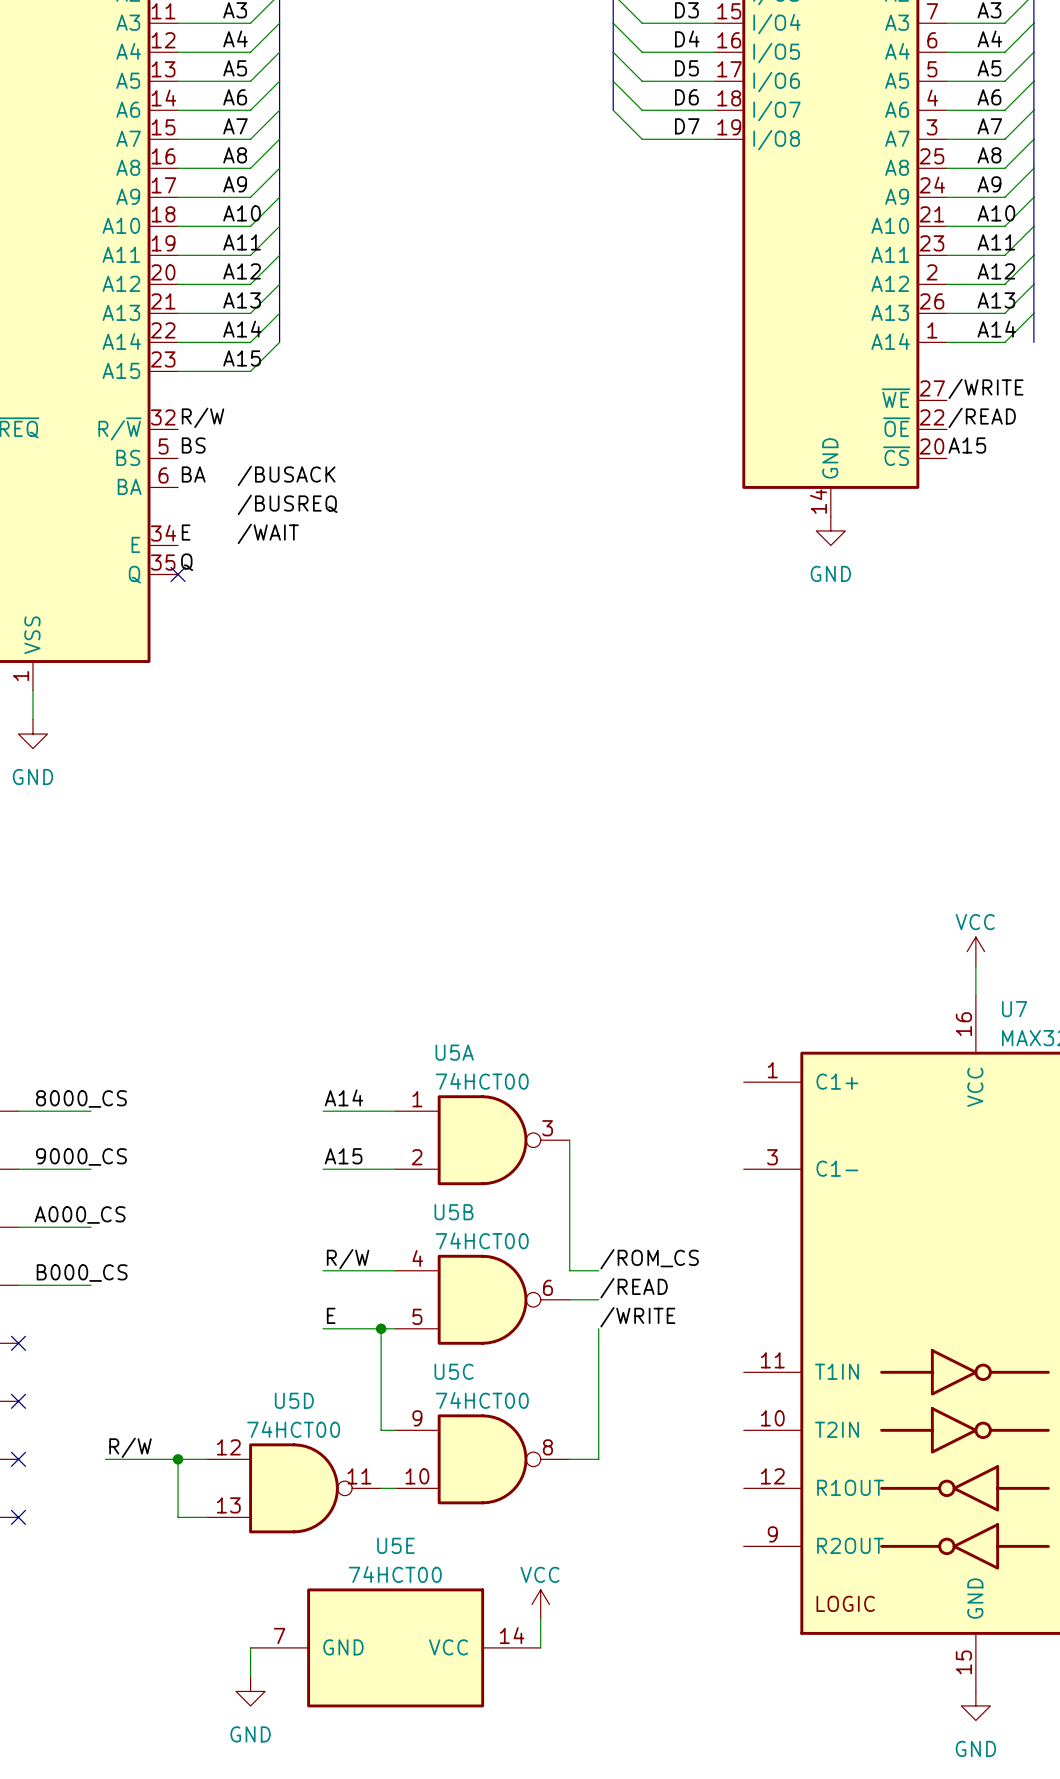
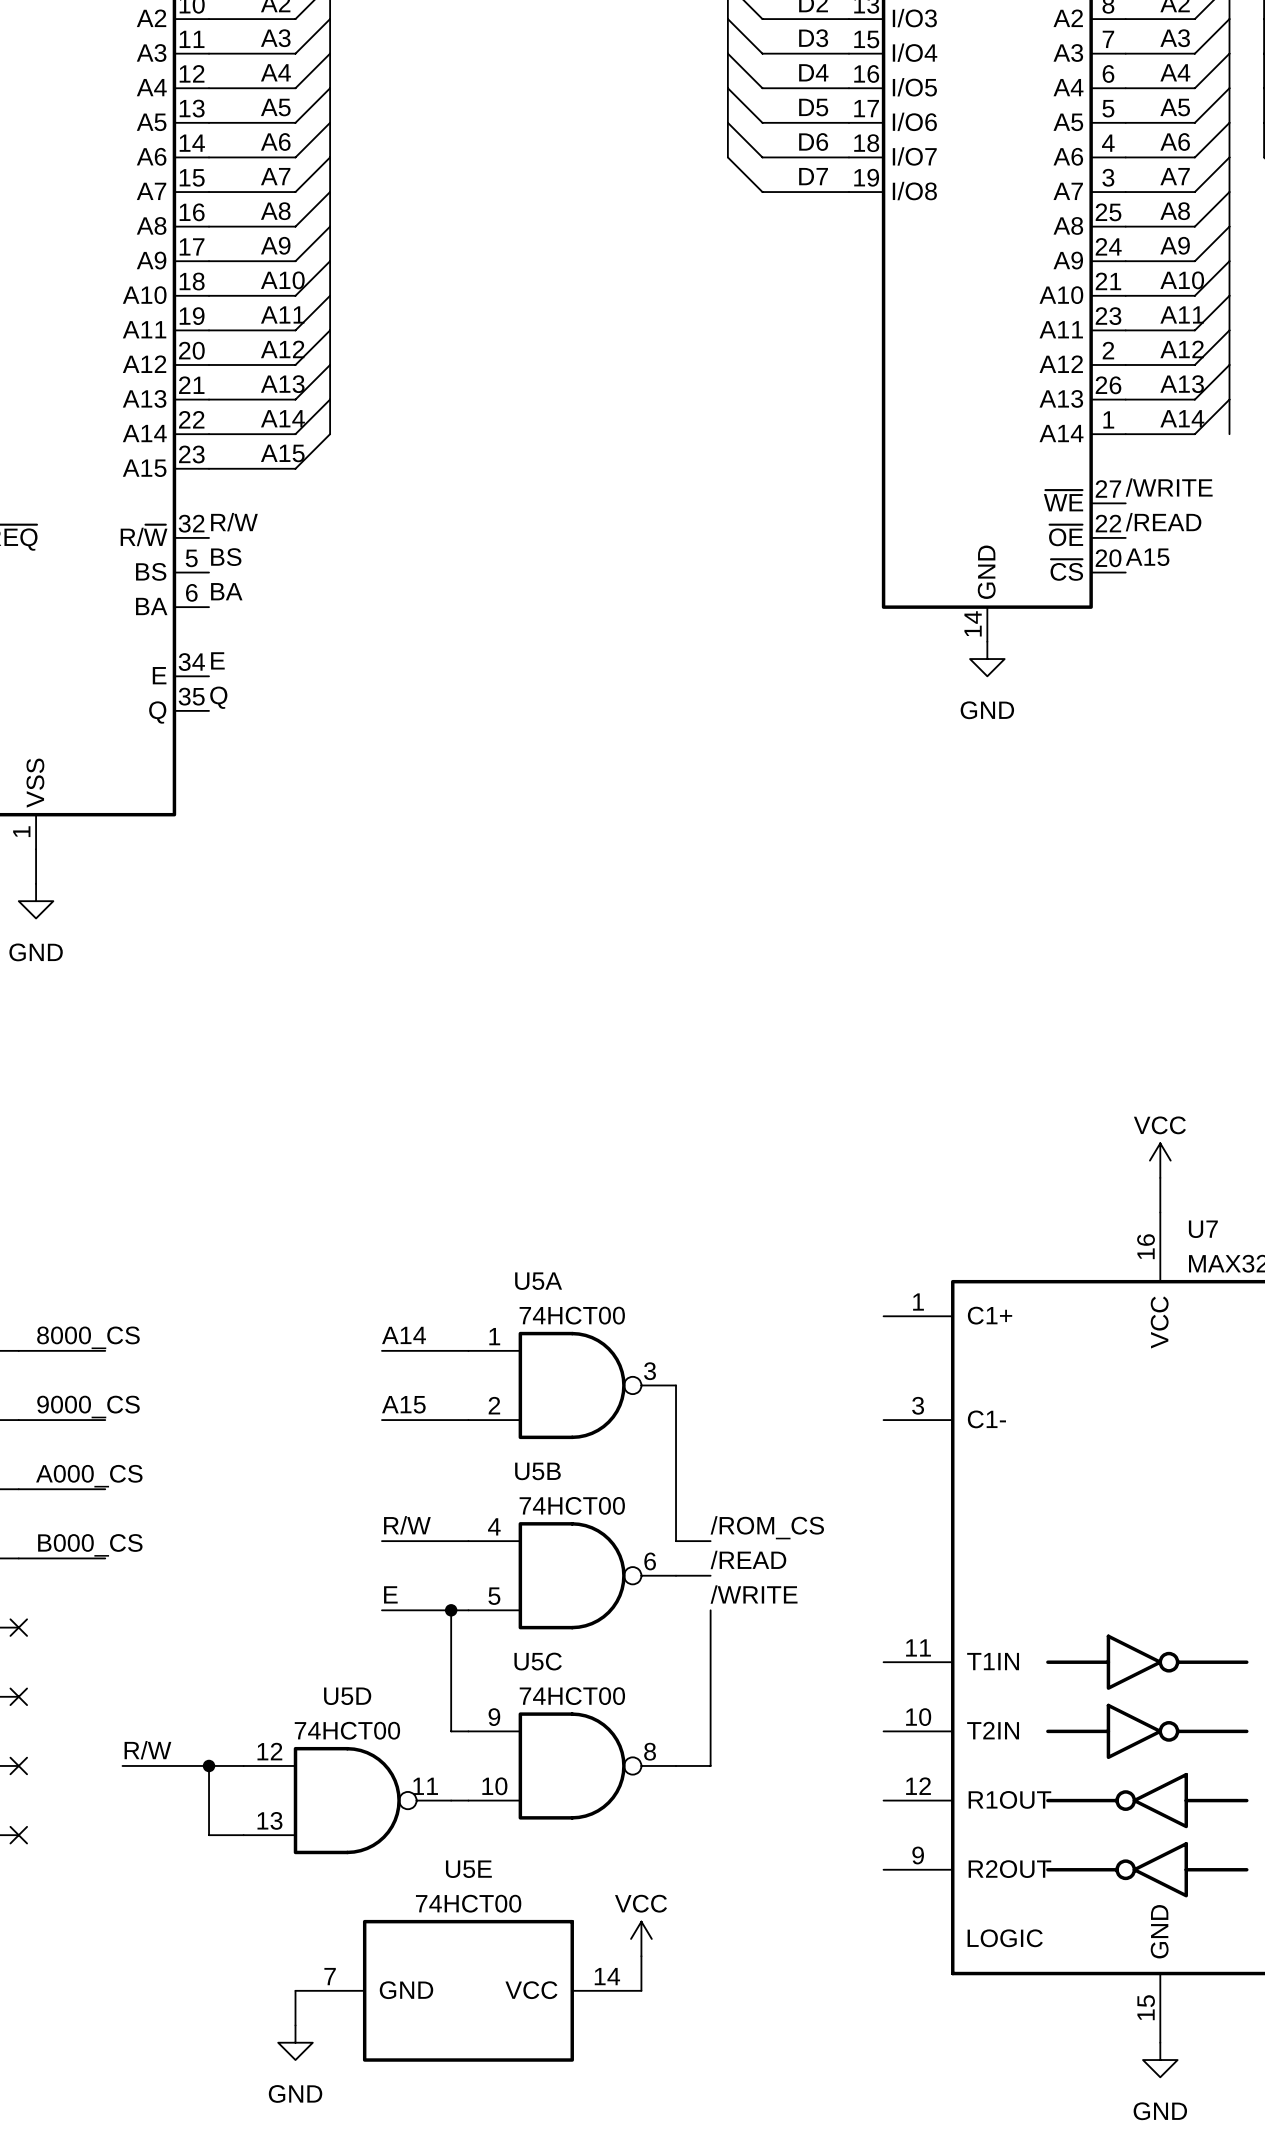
label: /BUSACK (286, 475) -> none
label: /BUSREQ (287, 504) -> none
label: /WAIT (268, 533) -> none
no-connect mark: (178, 574) -> none

